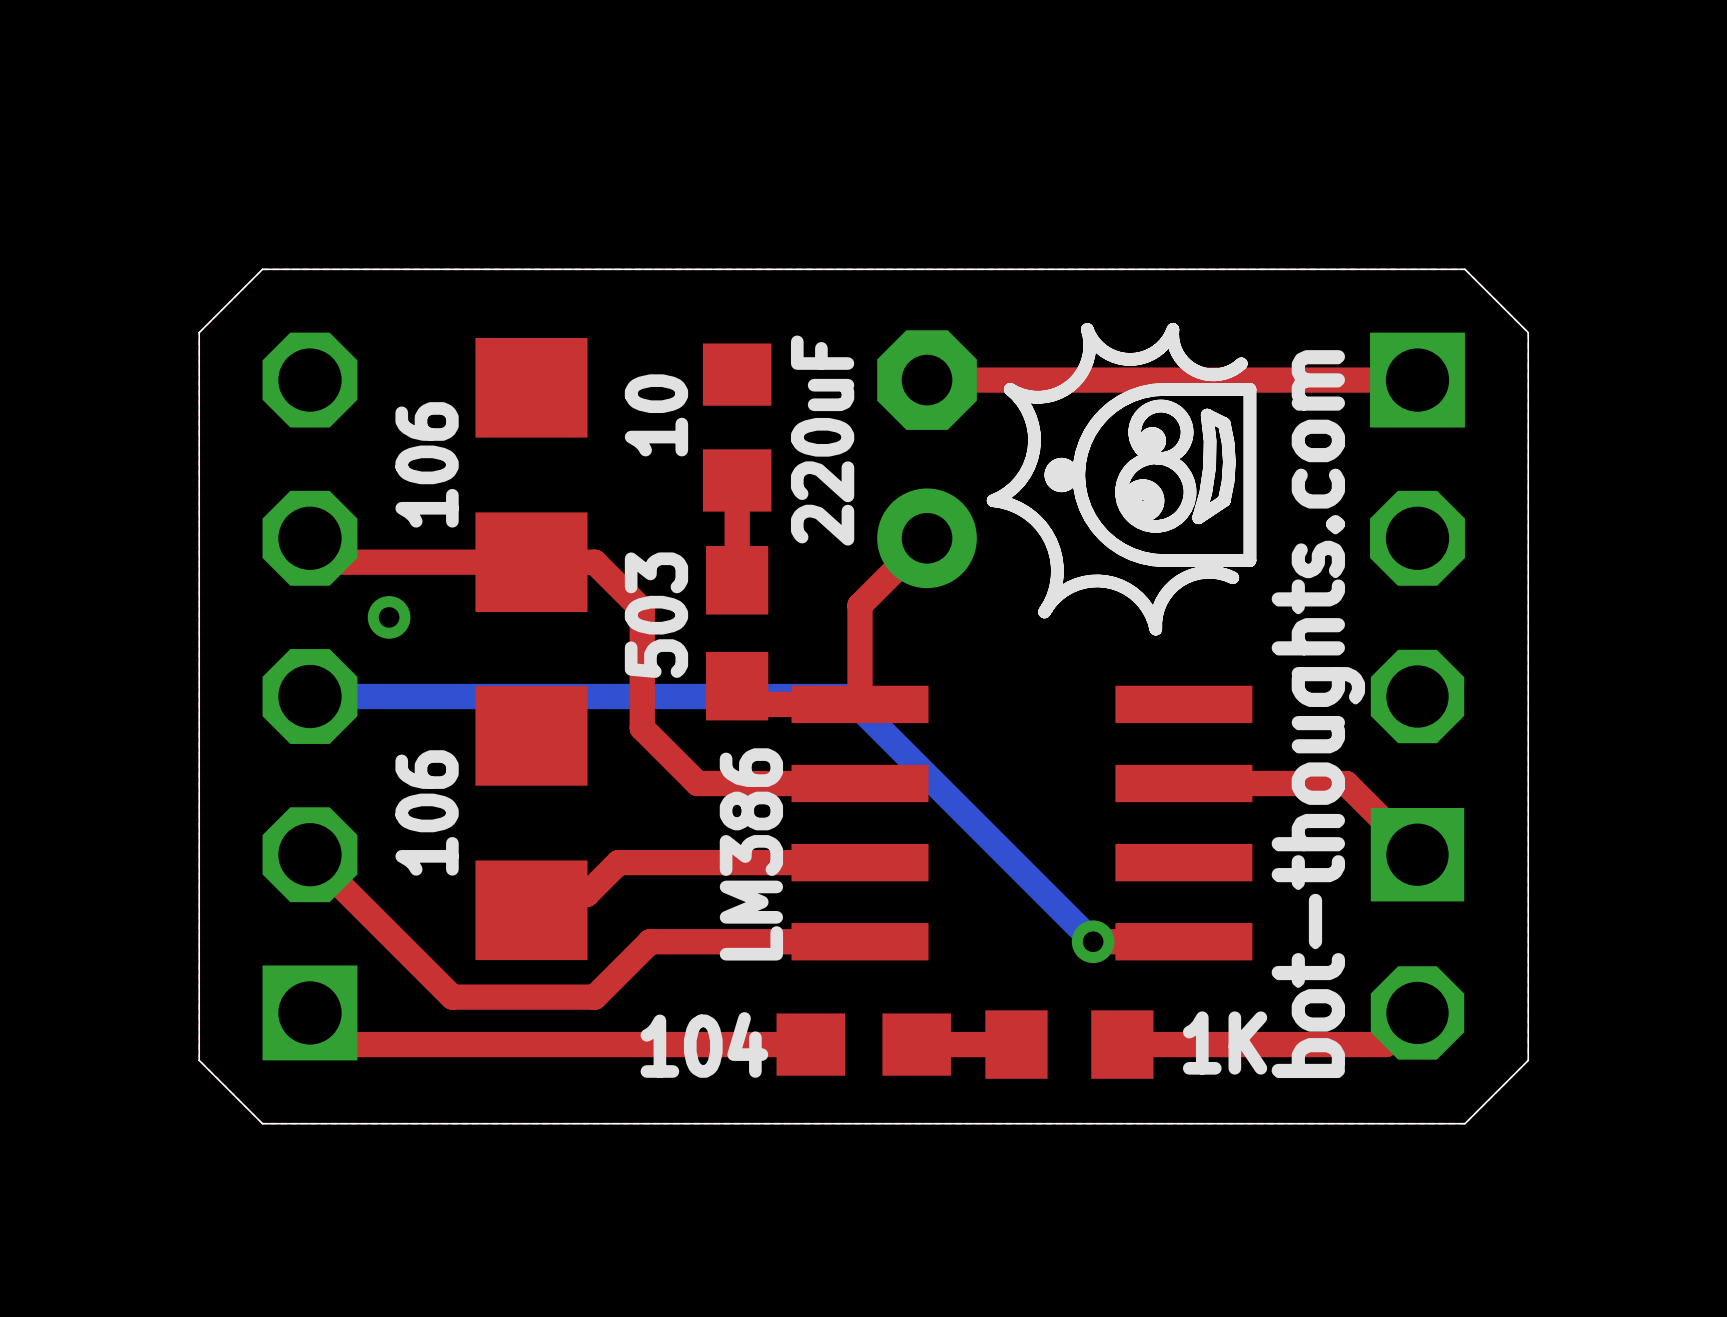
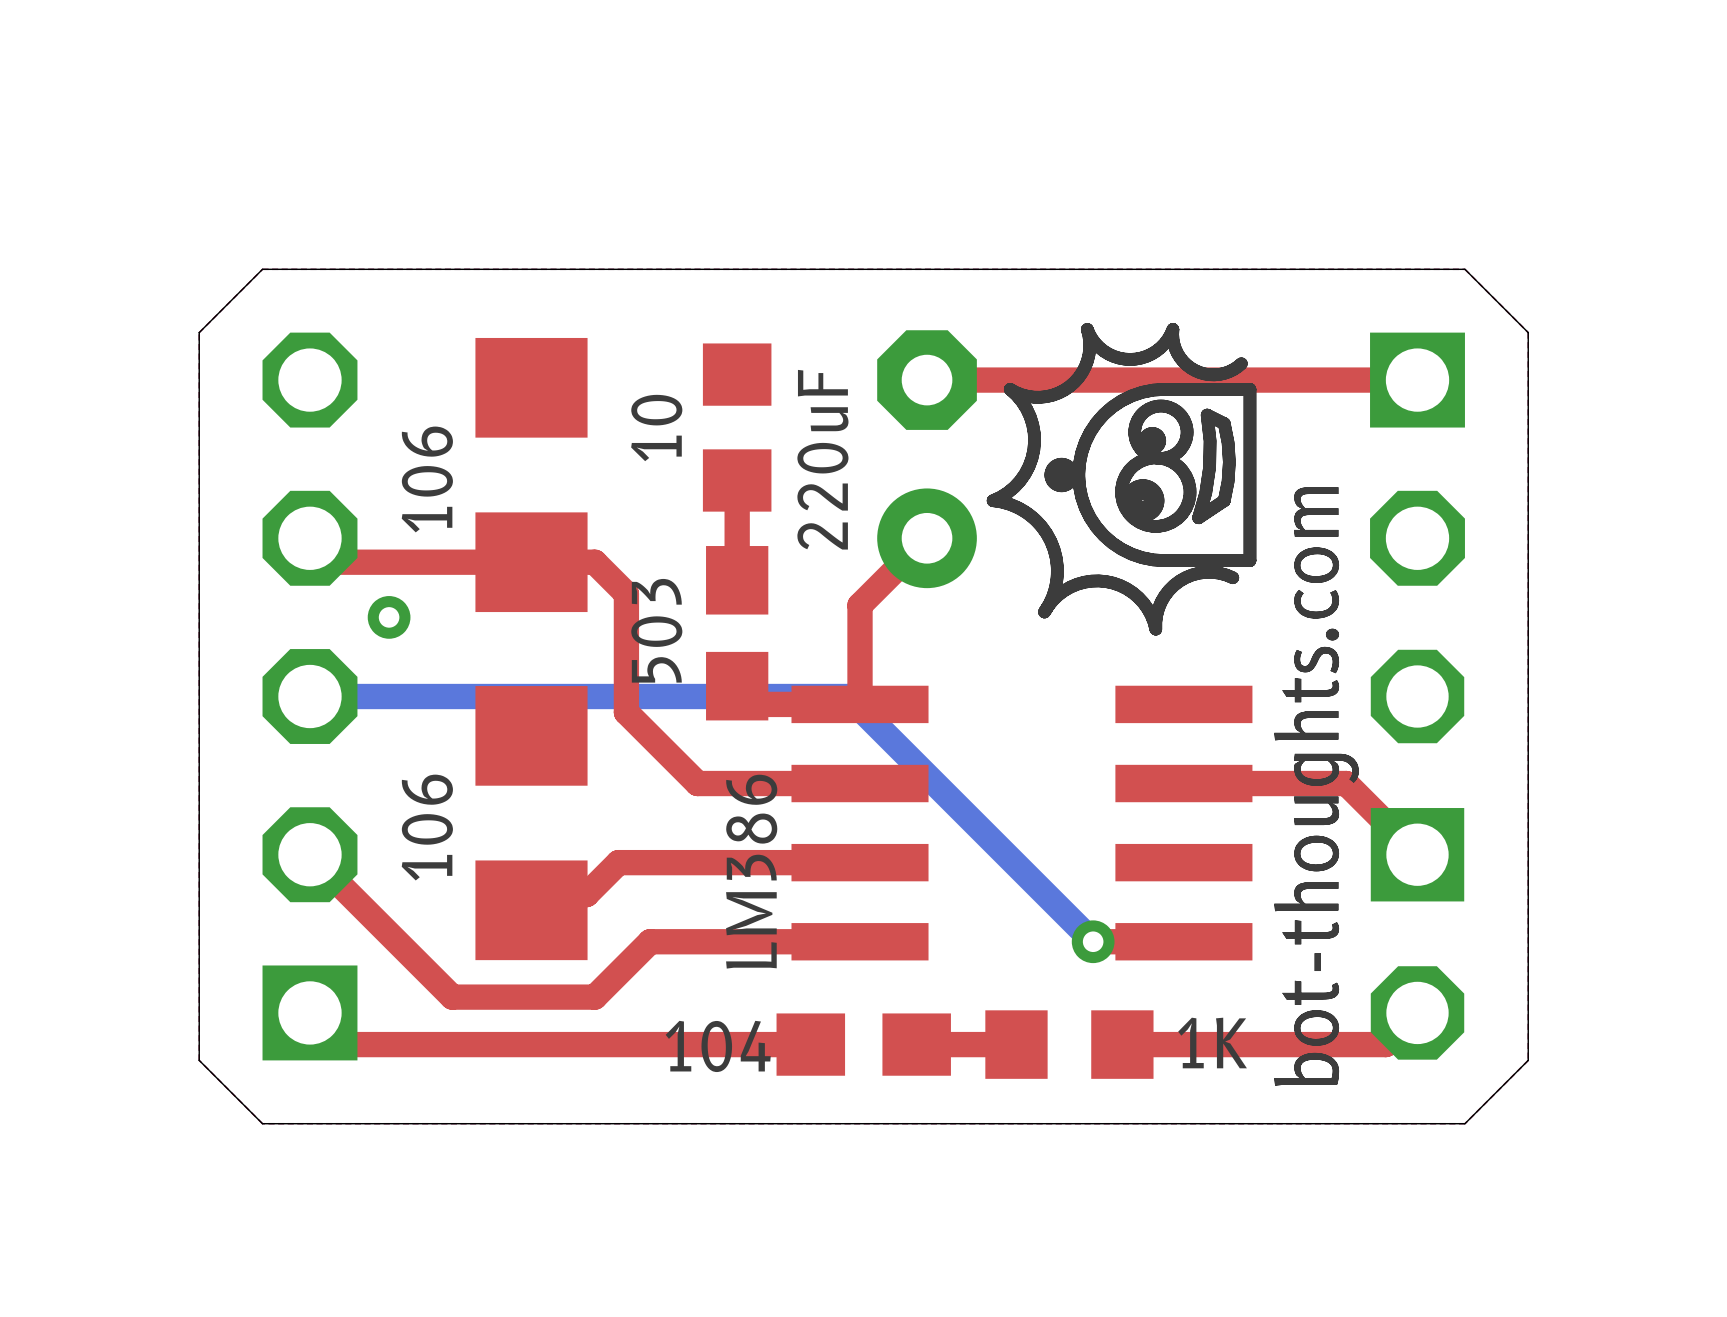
top track: (626, 593) (642, 609) (642, 728) -> (626, 593) (626, 712) (642, 728)

